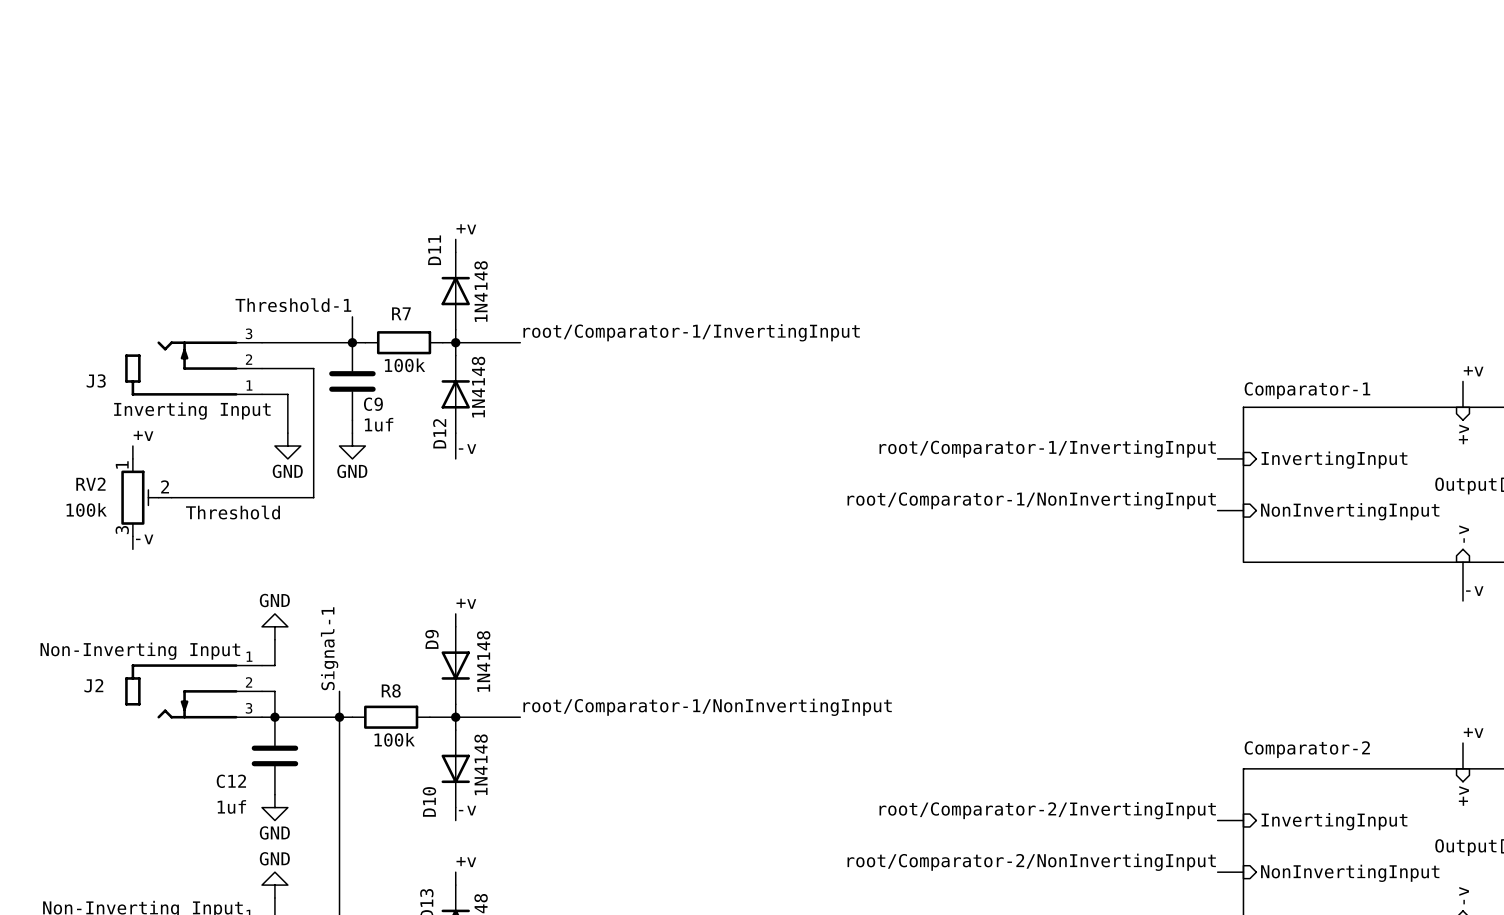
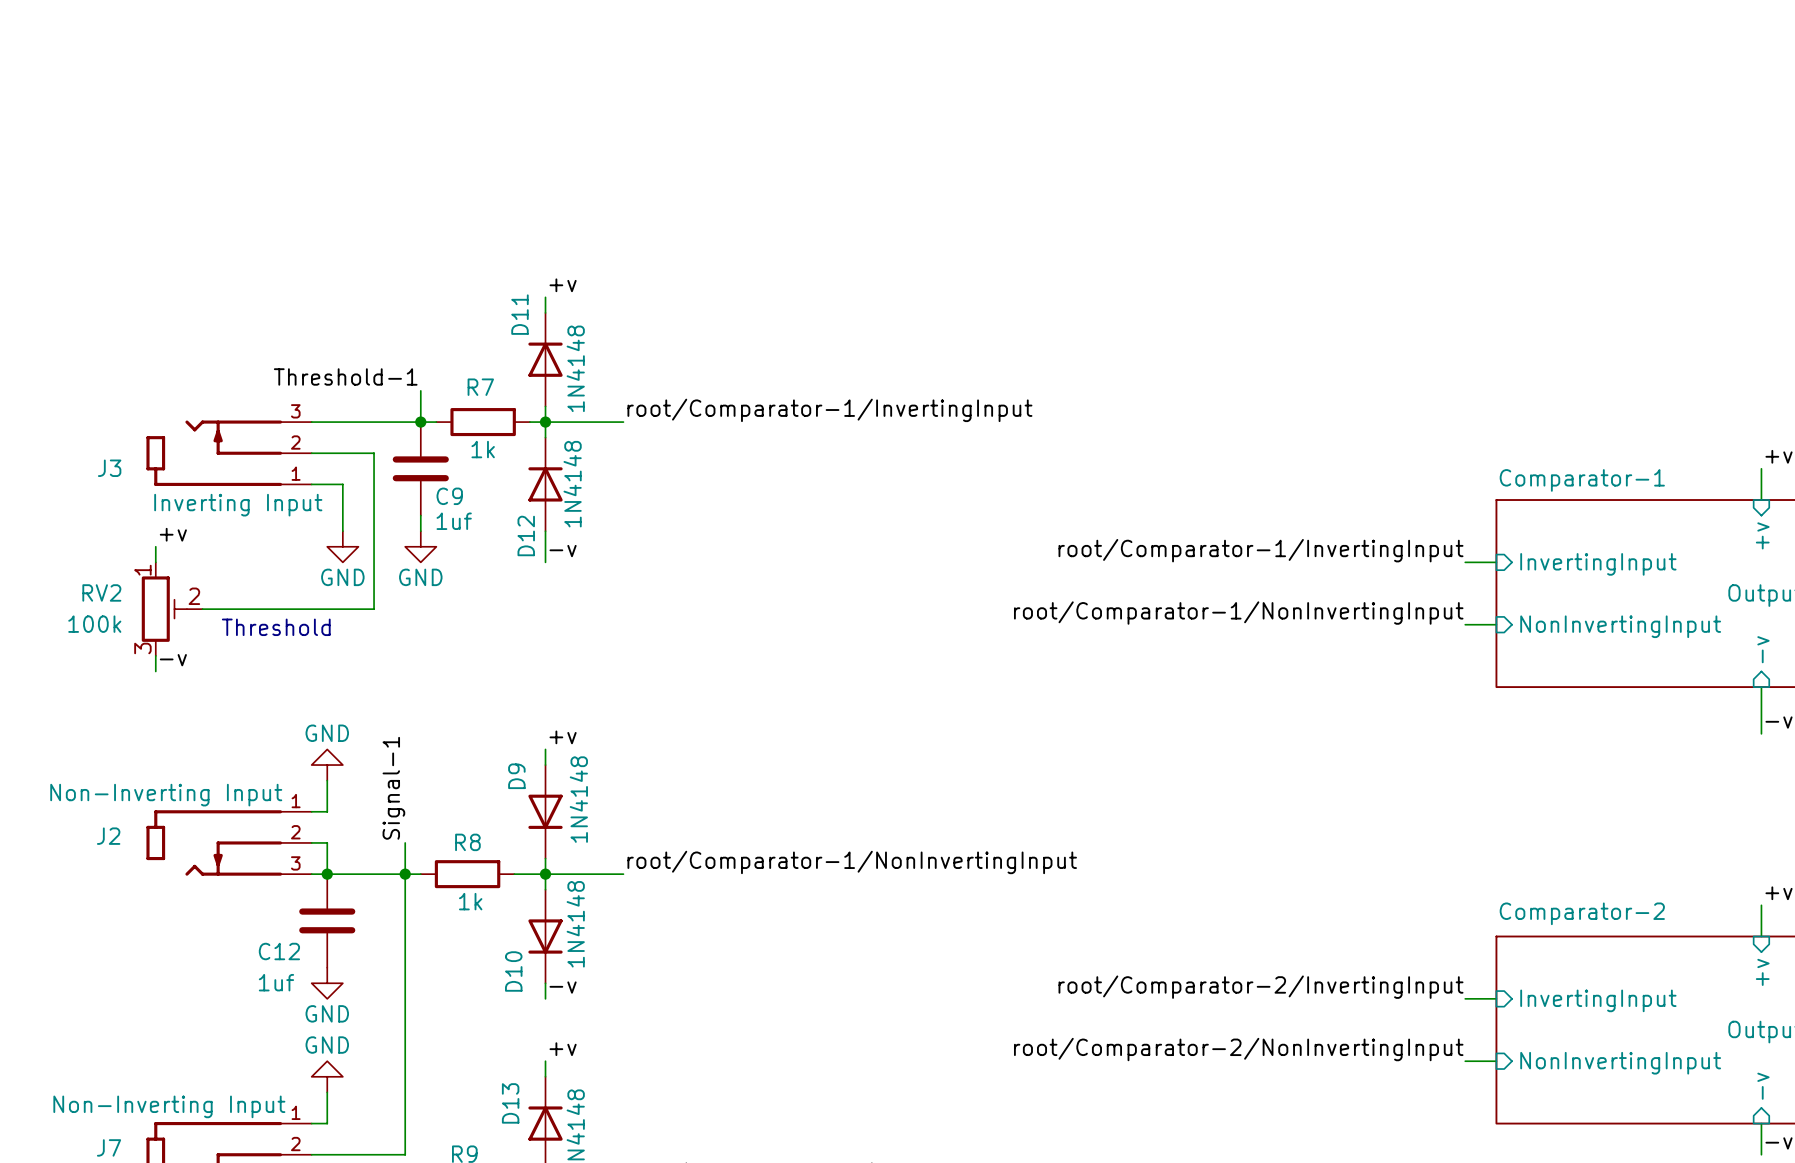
R7 value: 100k (405, 365) -> 1k (483, 449)
R8 value: 100k (394, 739) -> 1k (470, 901)

